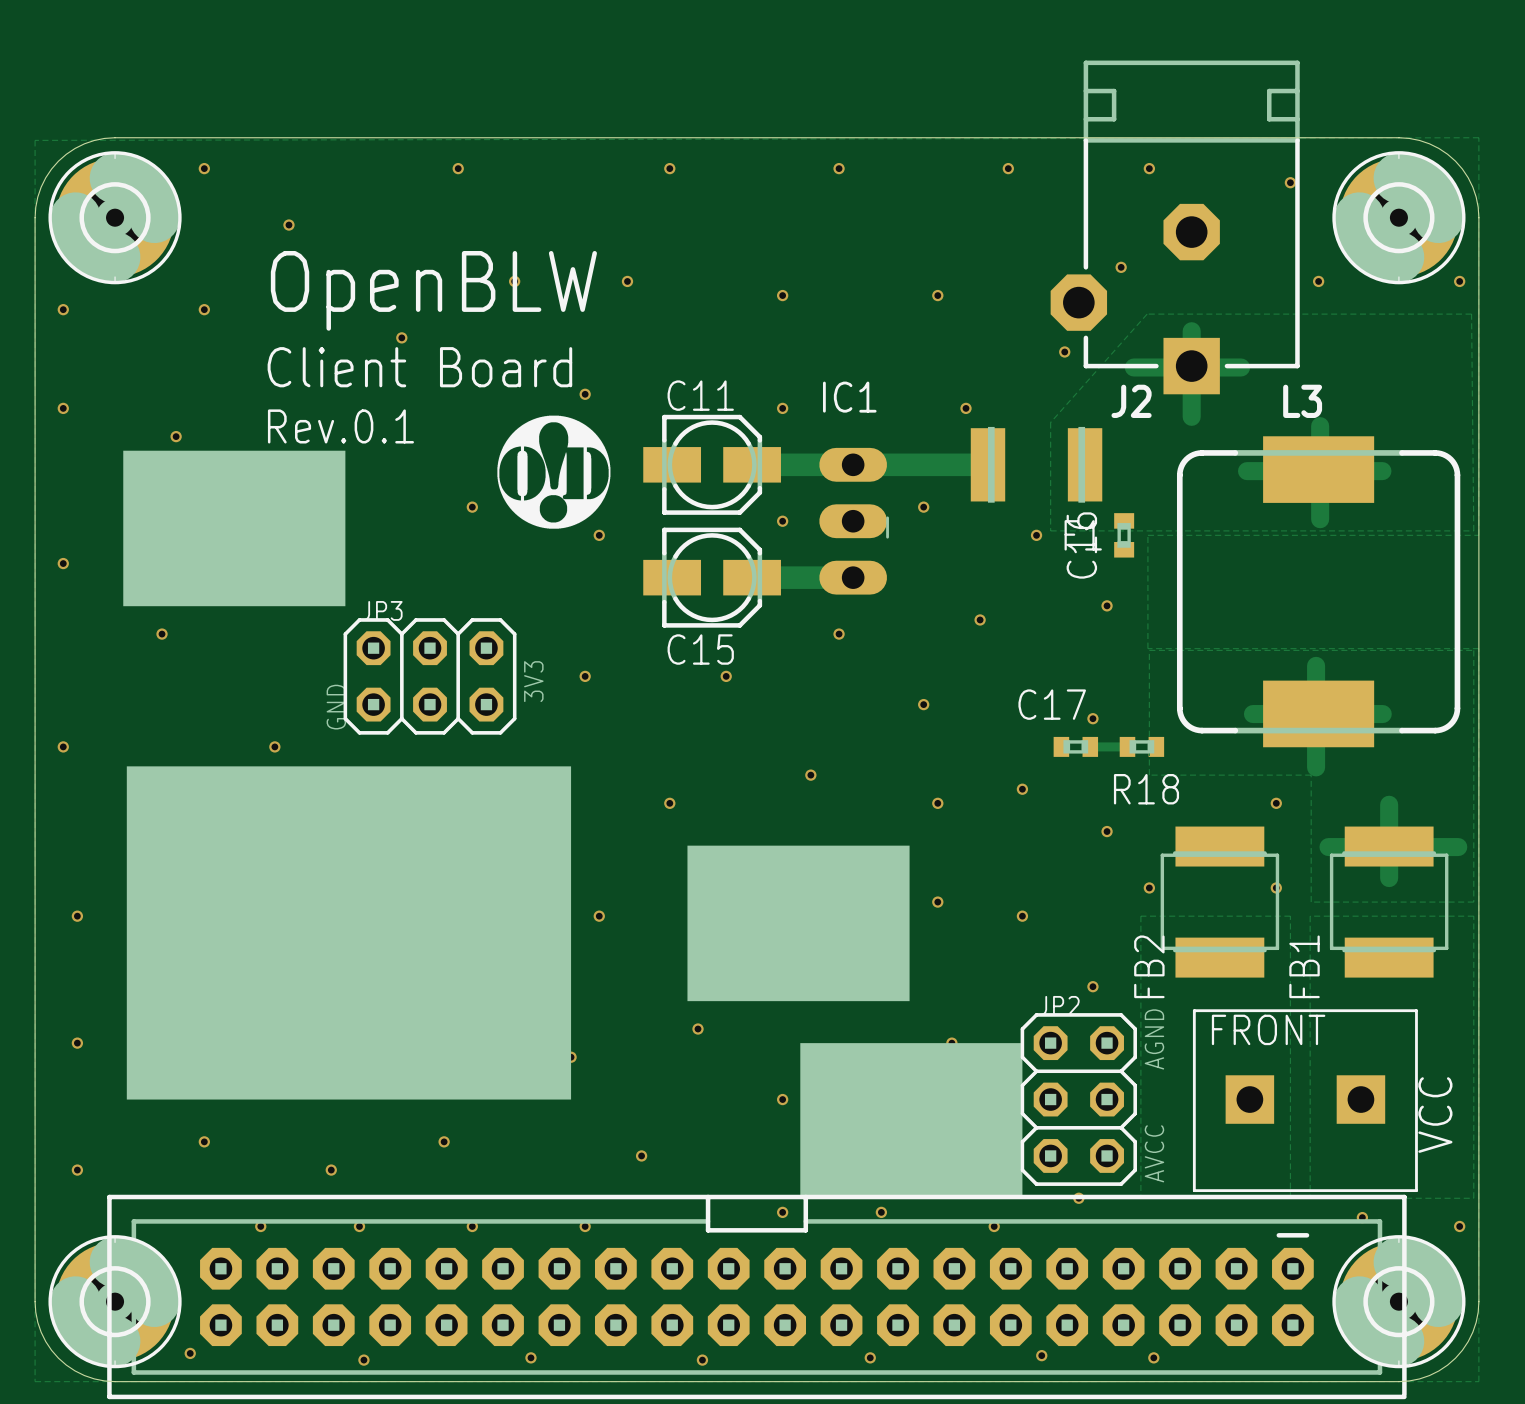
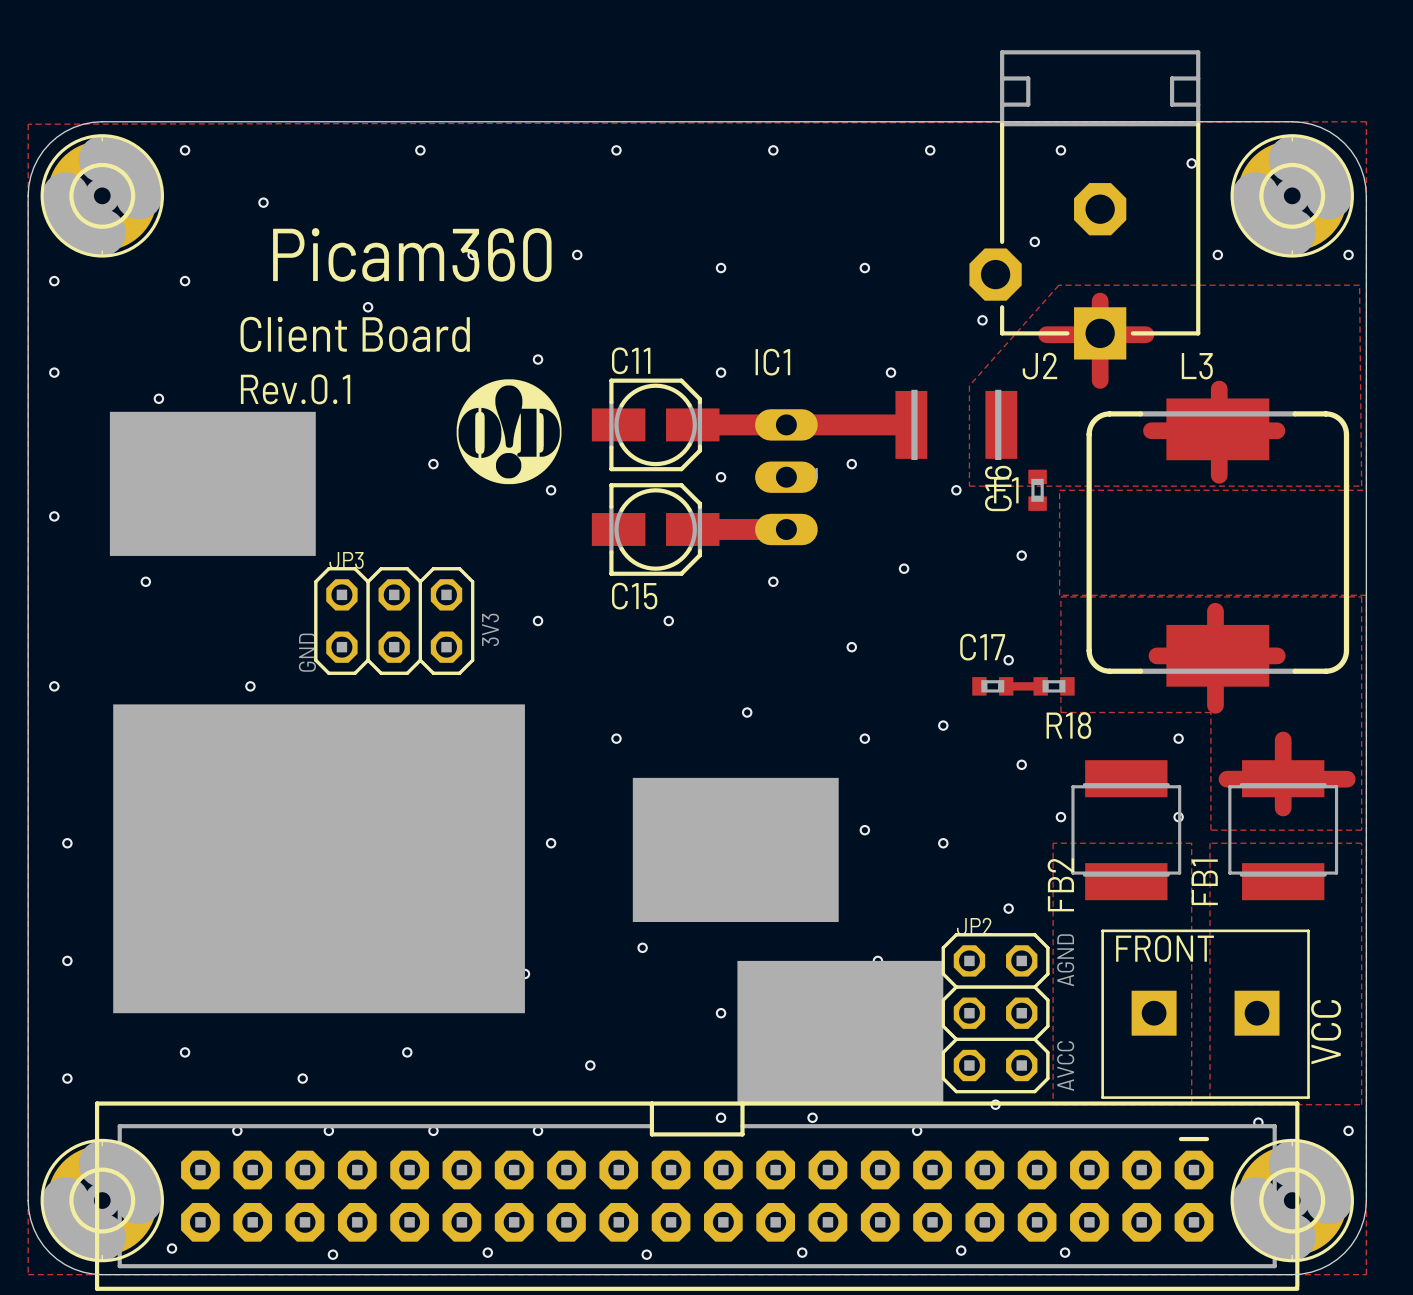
text: OpenBLW (433, 290) -> Picam360 (412, 254)

